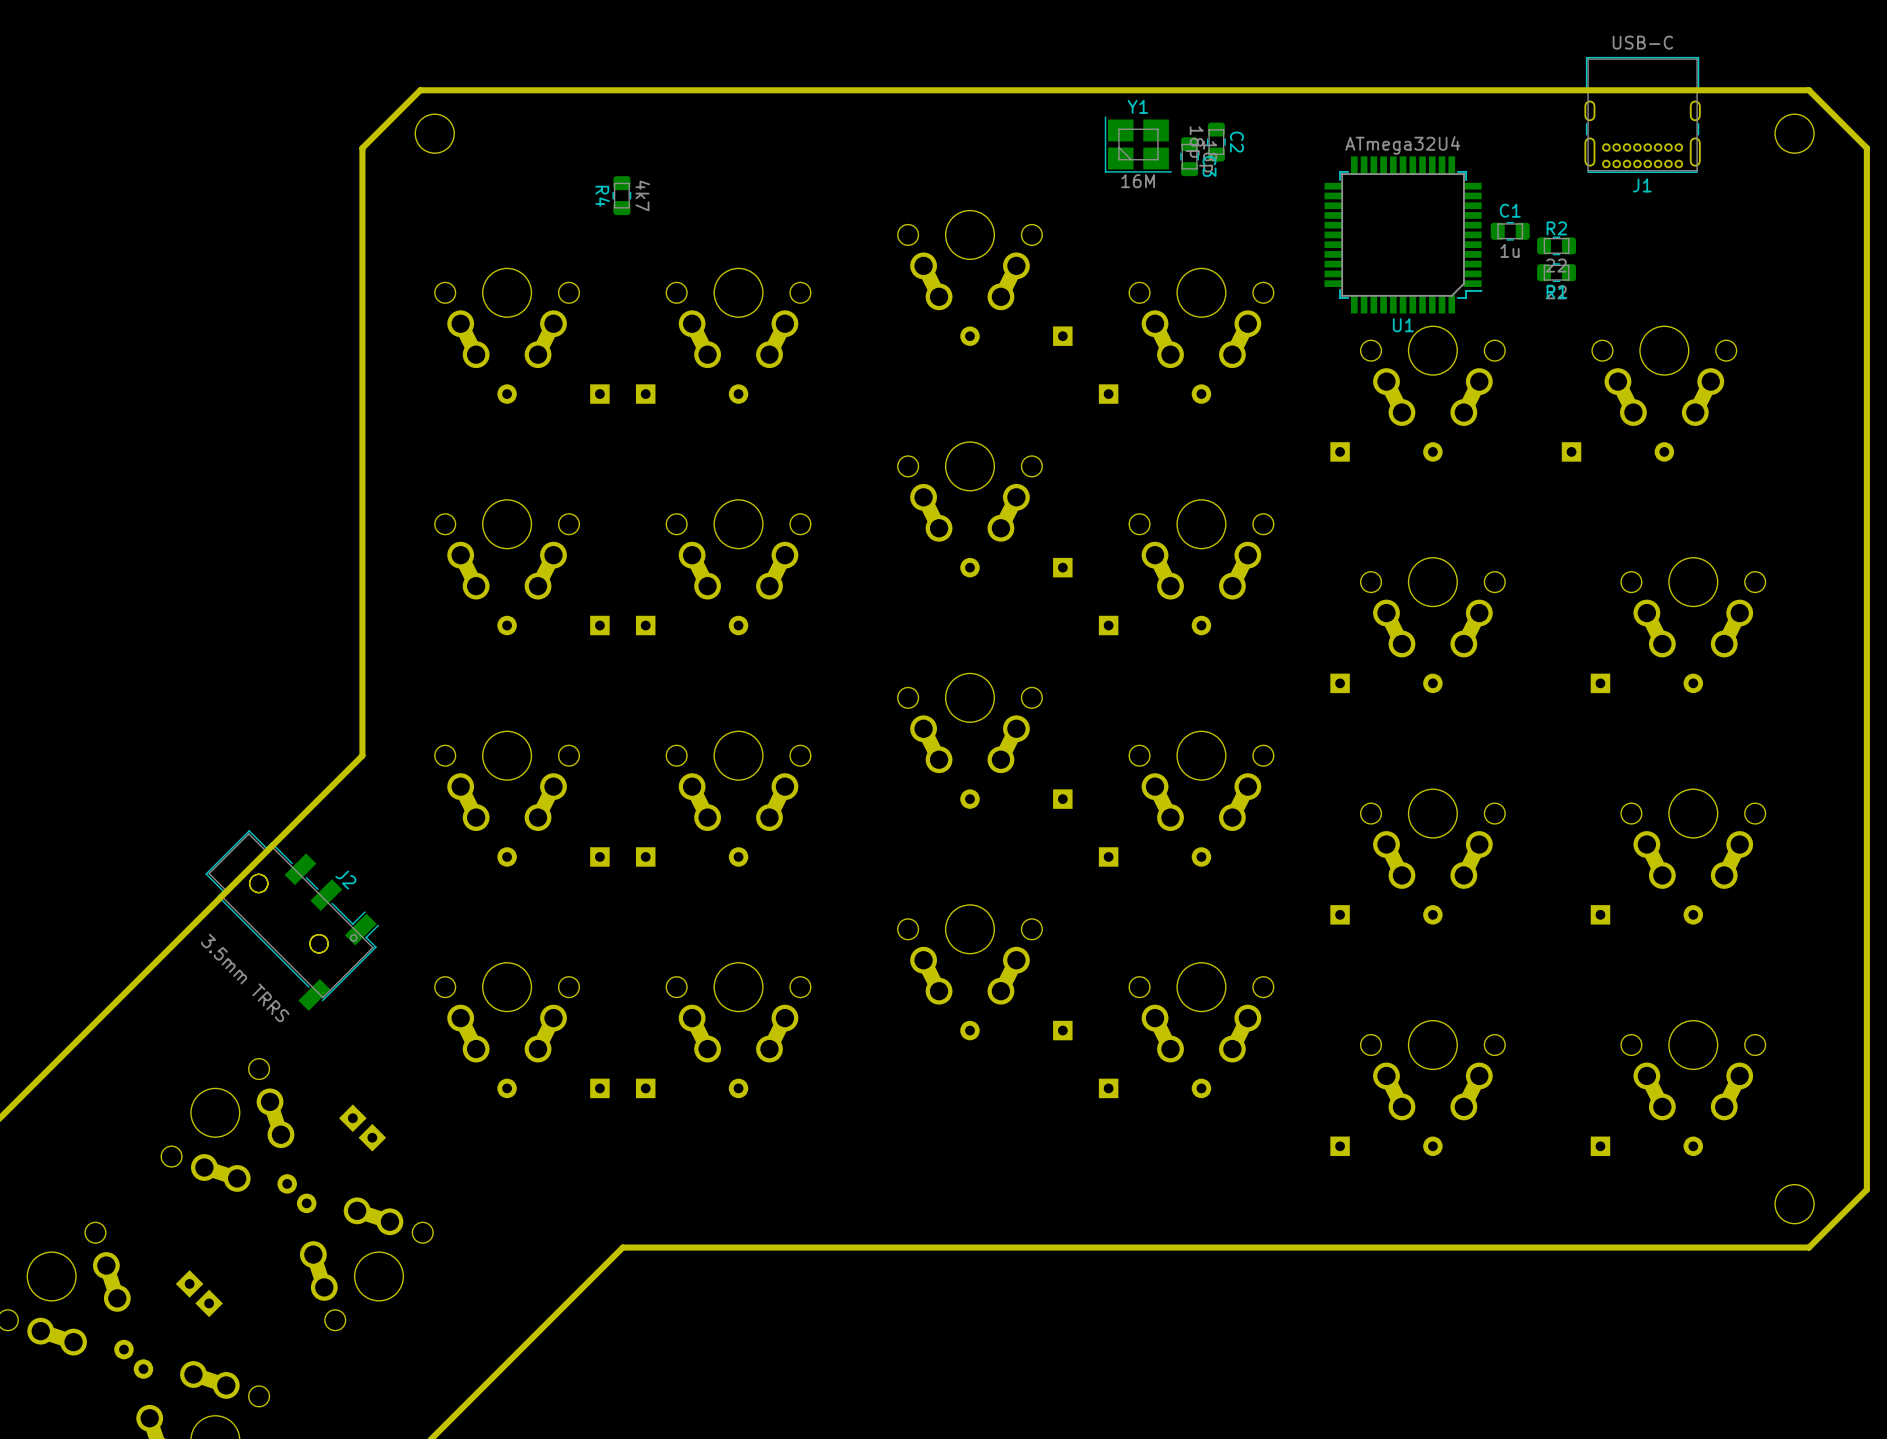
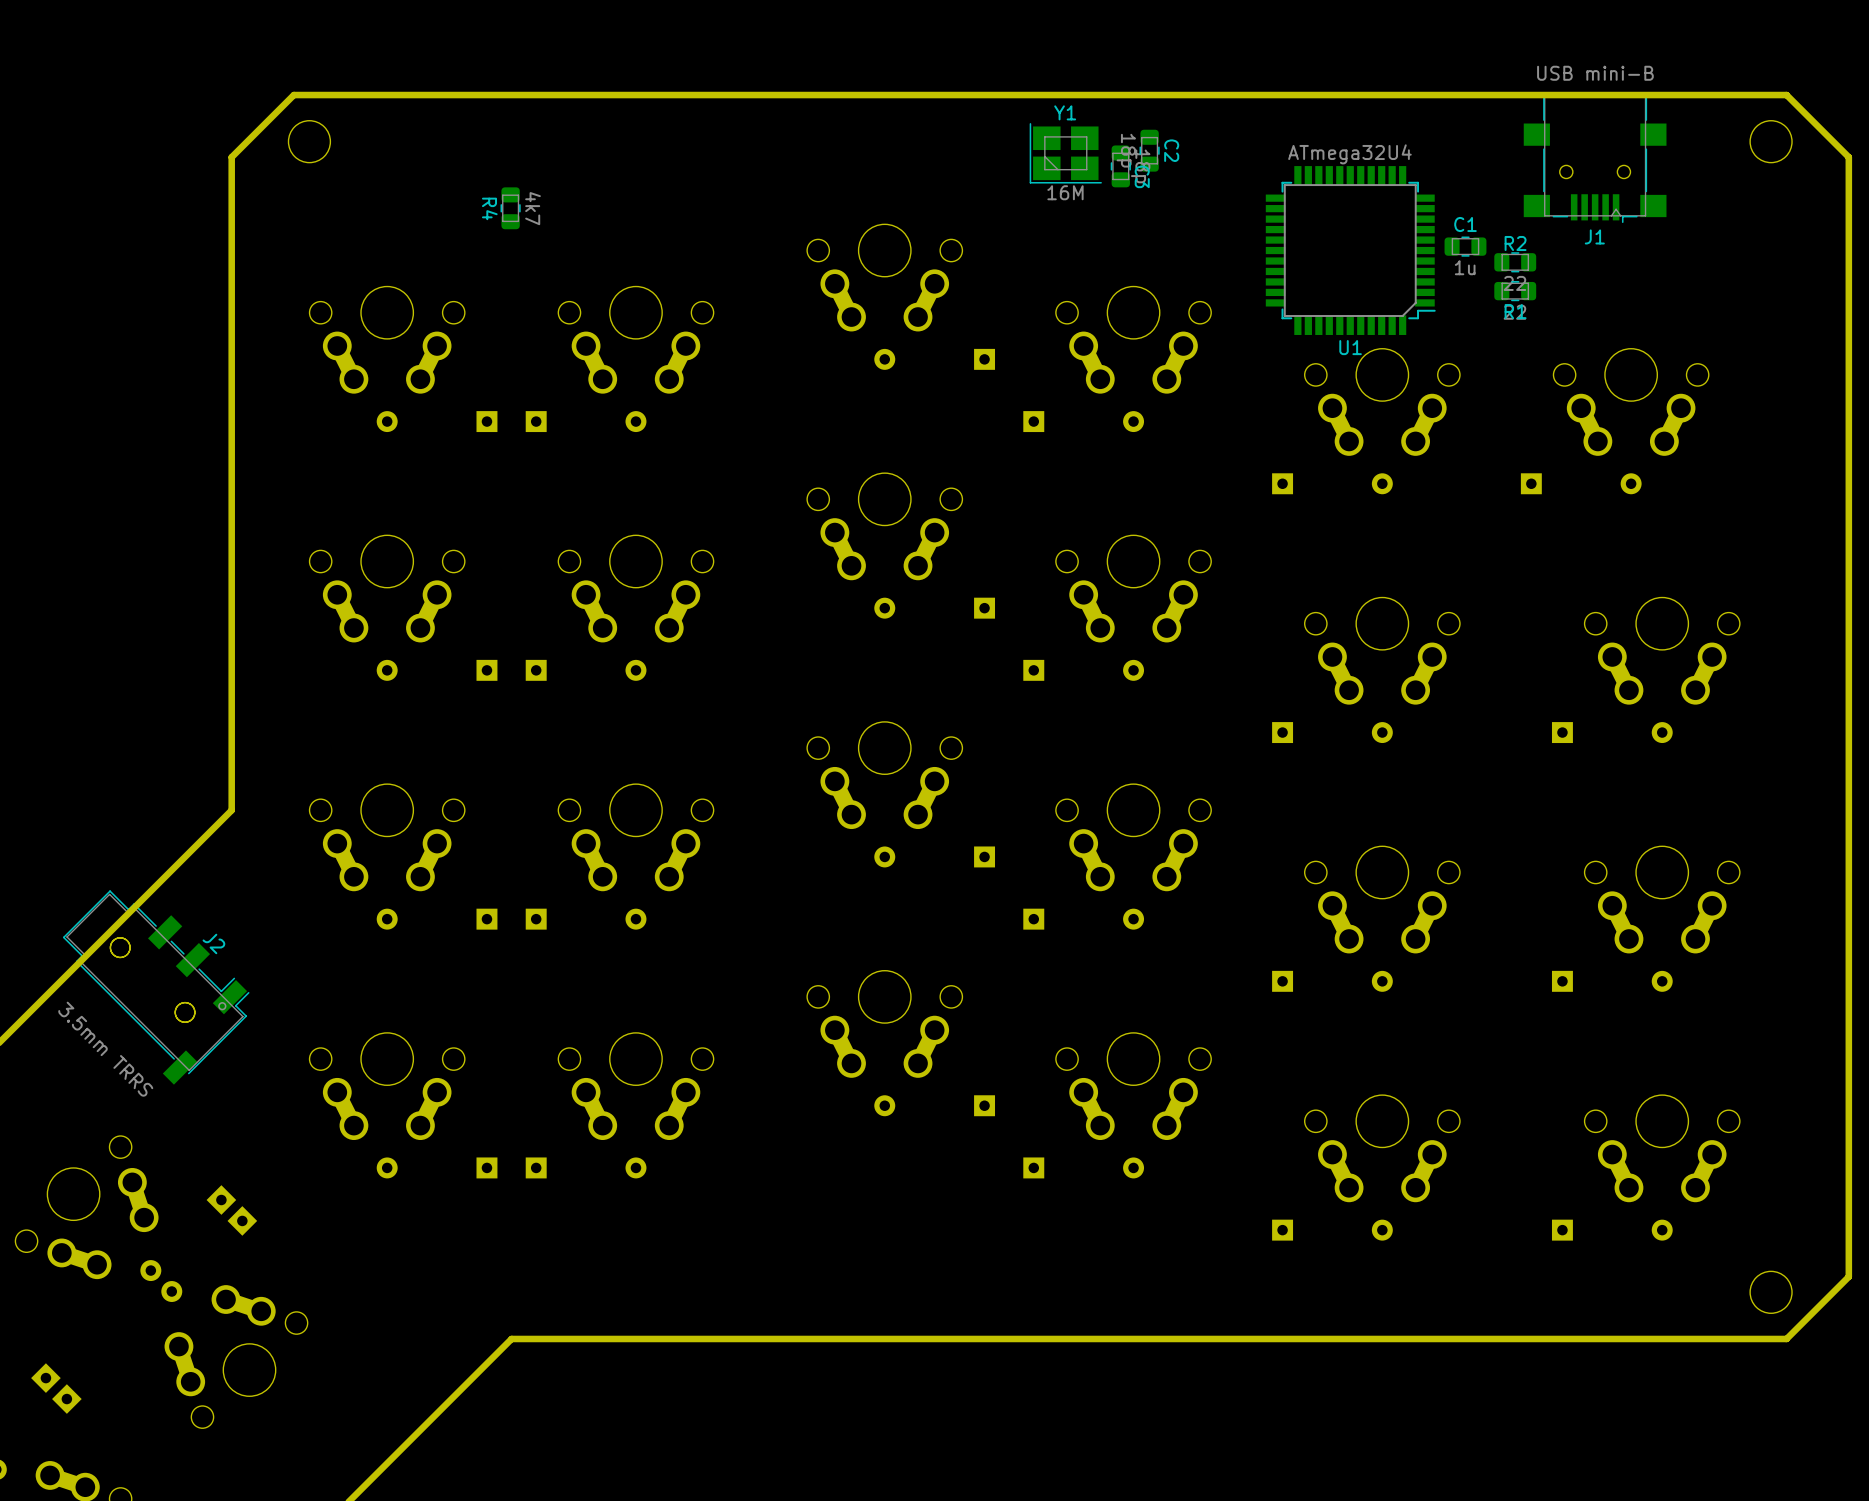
J1 value: USB-C (1642, 42) -> USB mini-B (1595, 73)
J1 footprint: [1584, 56, 1701, 173] -> [1523, 93, 1667, 224]

